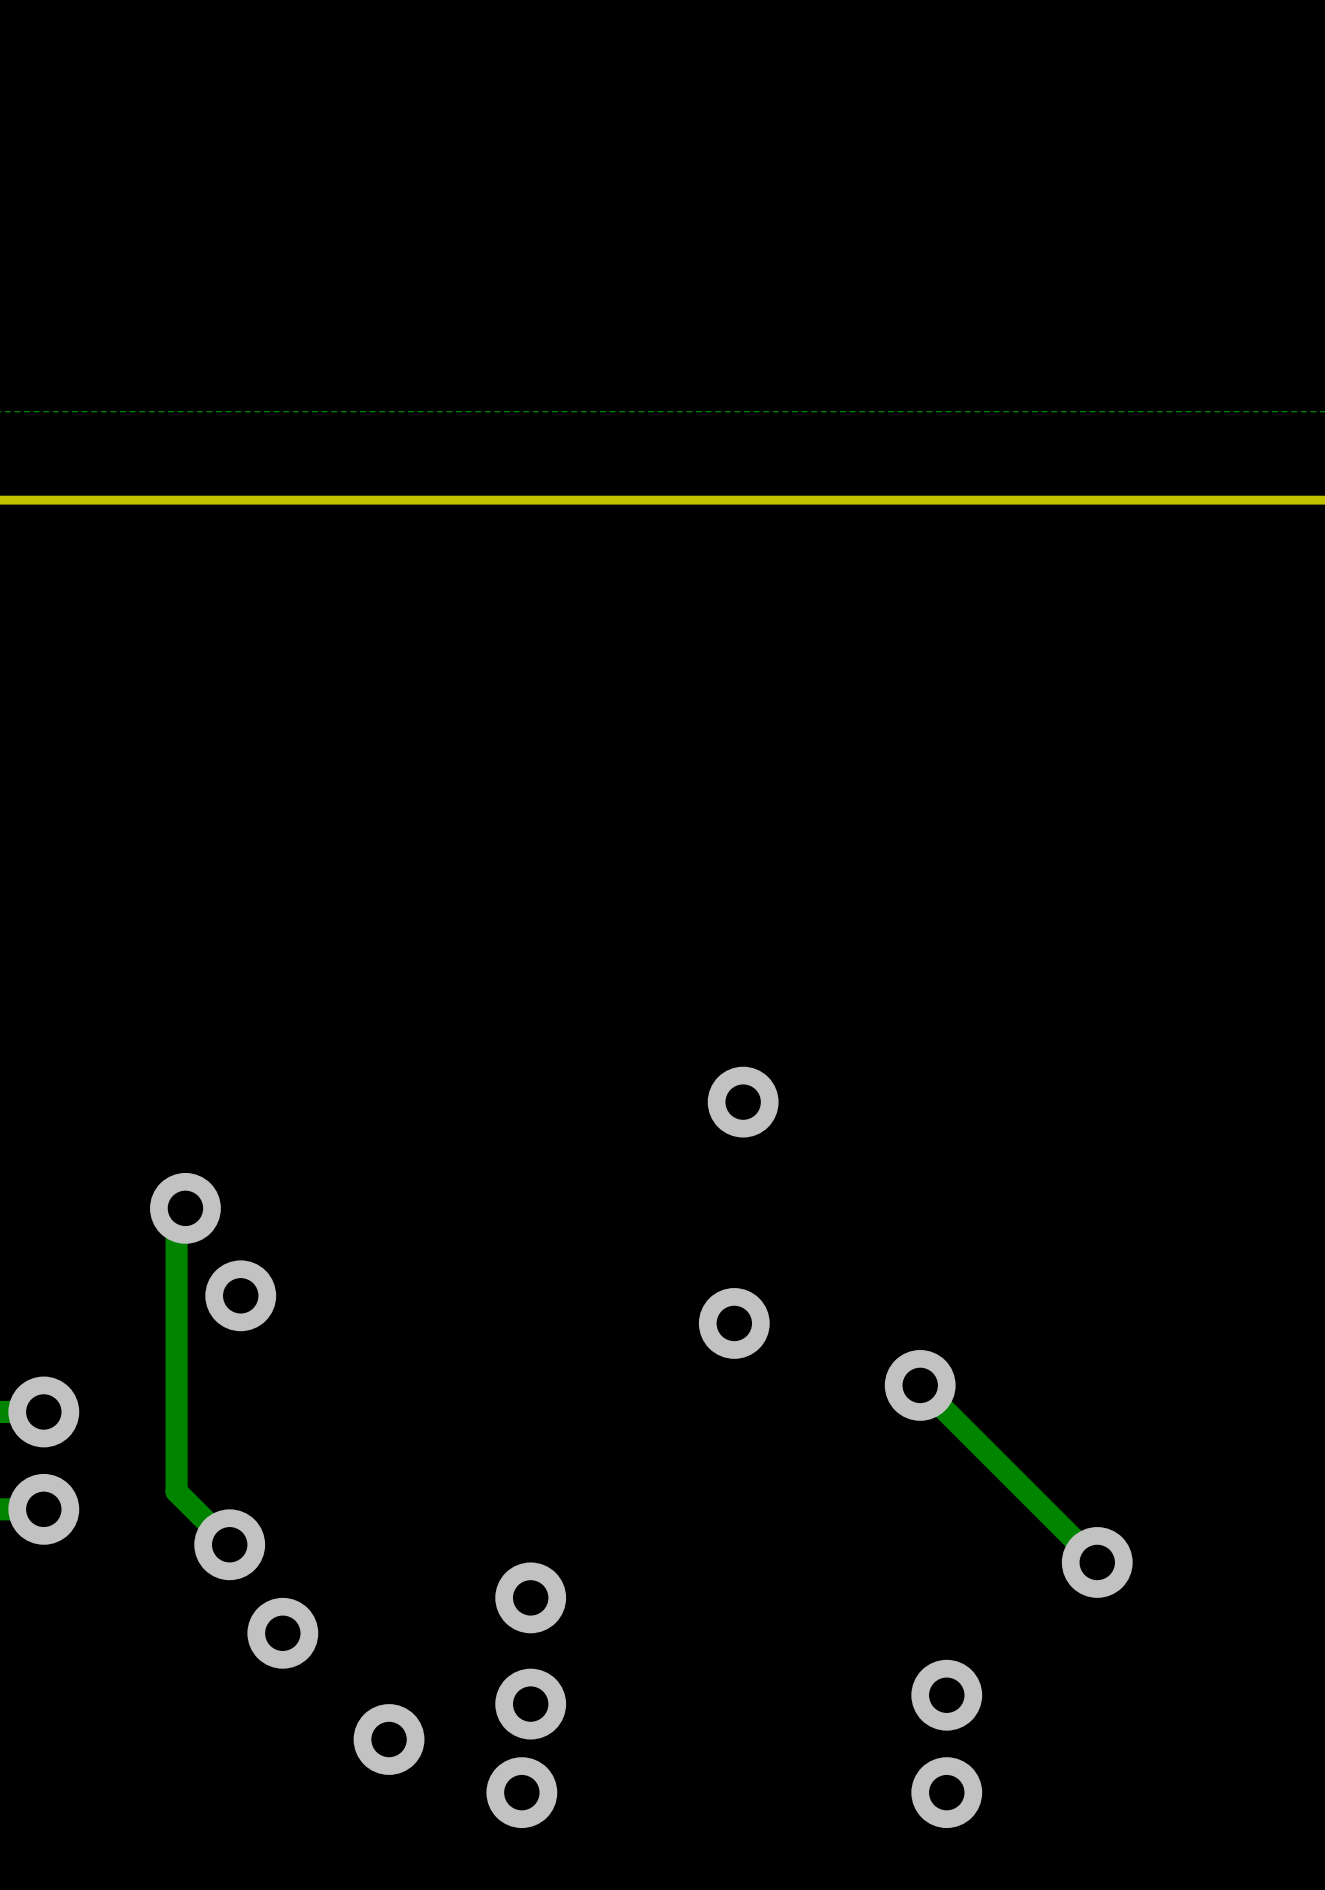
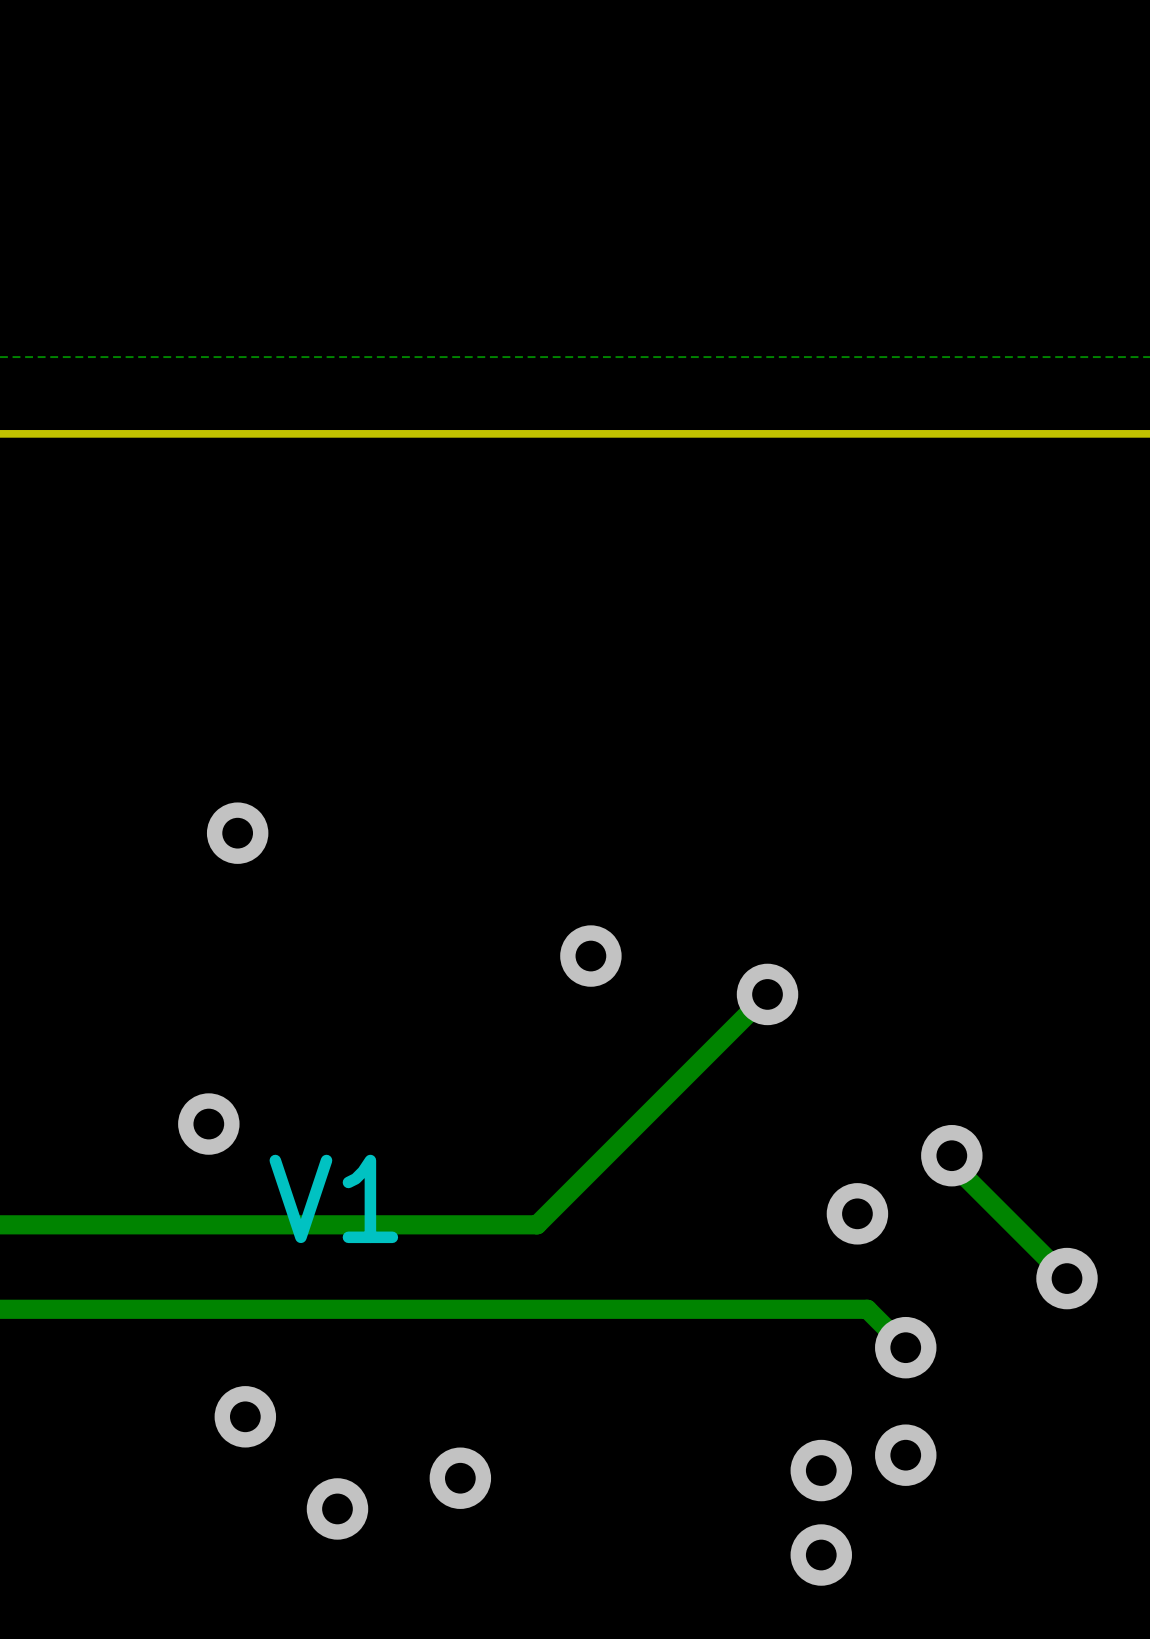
via: none -> (237, 833)
via position: (743, 1102) -> (590, 956)
track: none -> (767, 994) (537, 1224) (37, 1224)
via: none -> (767, 994)
track: (185, 1208) (176, 1217) (176, 1491) (229, 1544) -> none
via: (185, 1208) -> none
via: (734, 1323) -> none
track: none -> (951, 1155) (951, 1163) (1067, 1278)
via: none -> (951, 1155)
text: none -> V1 (333, 1198)
track: (920, 1385) (1097, 1562) -> none
via position: (920, 1385) -> (857, 1213)
via: (43, 1411) -> none
via: none -> (1067, 1278)
track: none -> (37, 1309) (867, 1309) (905, 1347)
via: (43, 1509) -> none
via: (229, 1544) -> none
via position: (1097, 1562) -> (905, 1347)
via: (530, 1597) -> none
via: none -> (905, 1455)
via: (521, 1792) -> none

